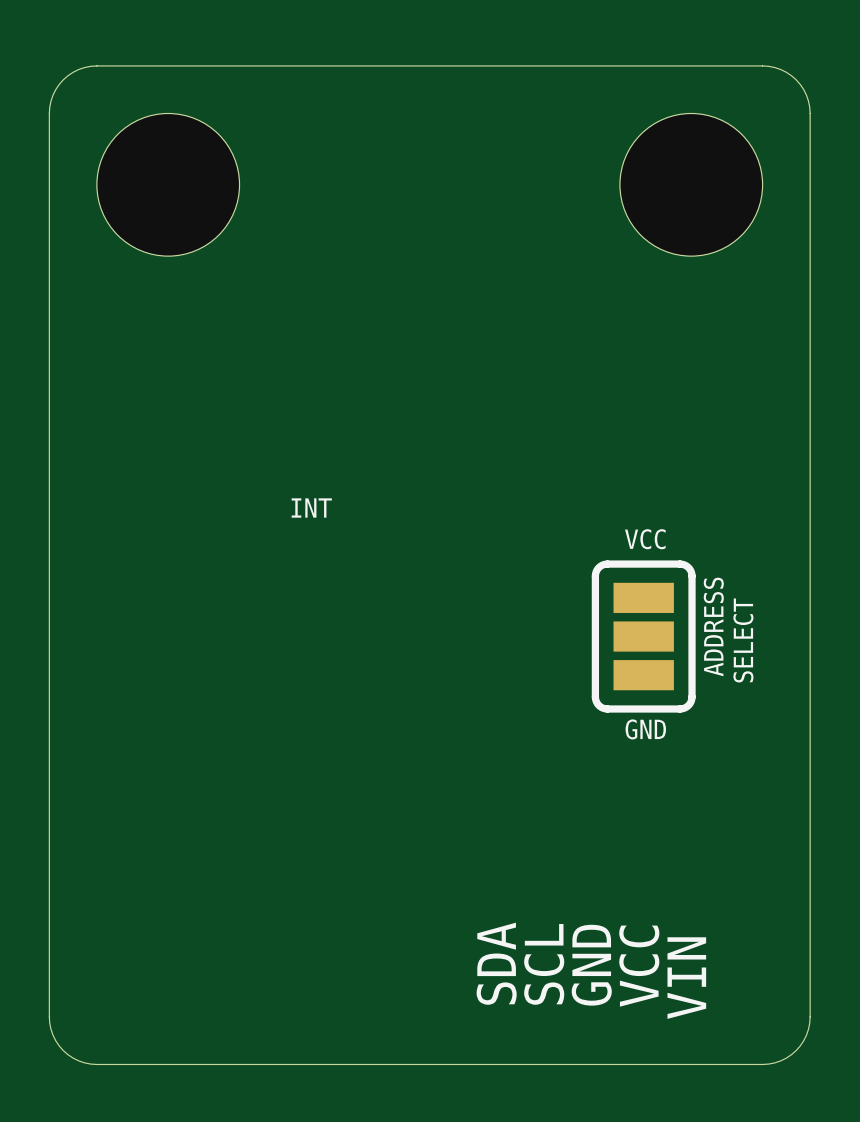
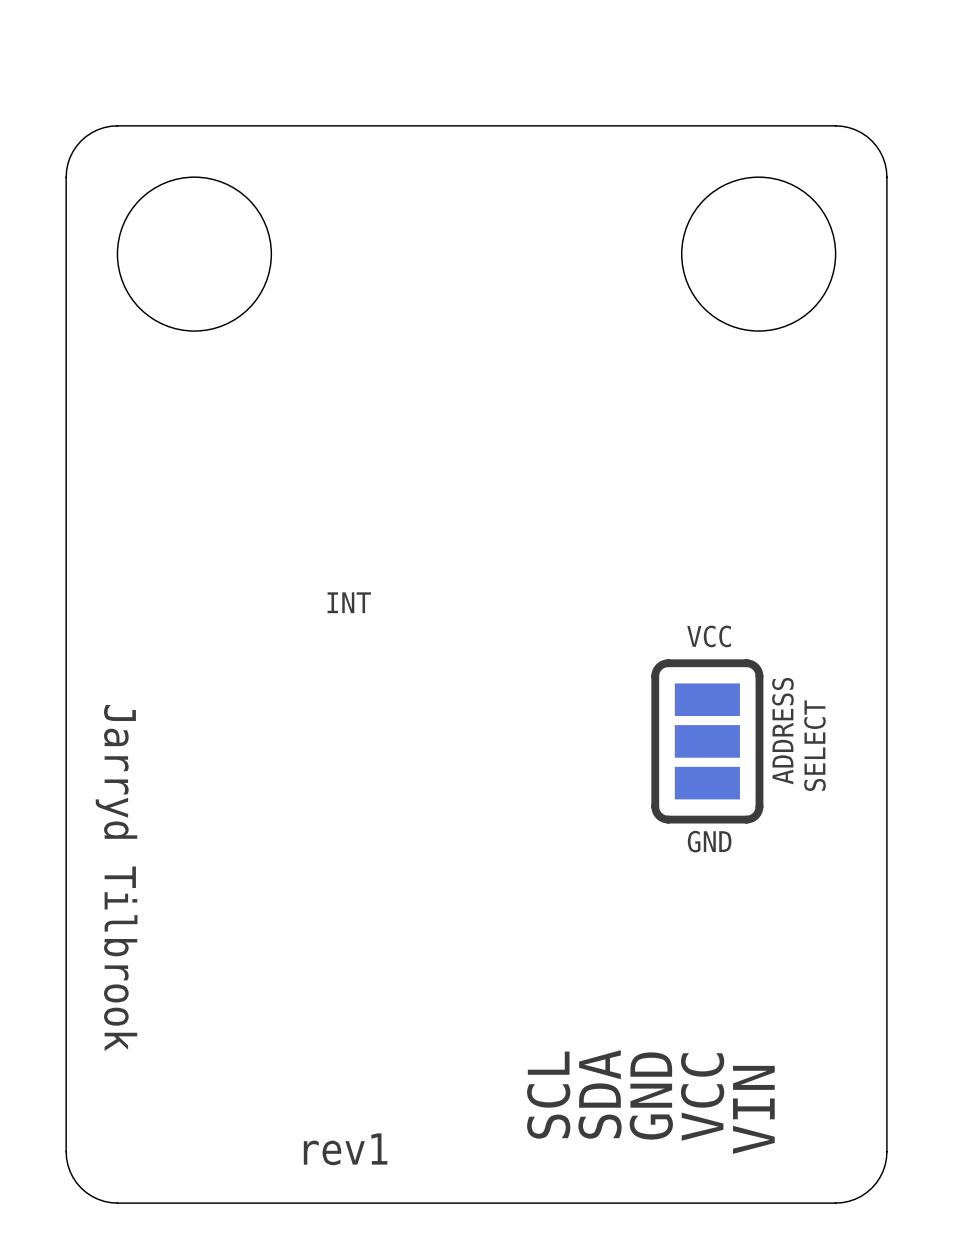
text: none -> Jarryd Tilbrook (116, 877)
text position: SDA (496, 963) -> SDA (600, 1094)
text position: SCL (544, 964) -> SCL (548, 1095)
text: none -> rev1 (345, 1149)

